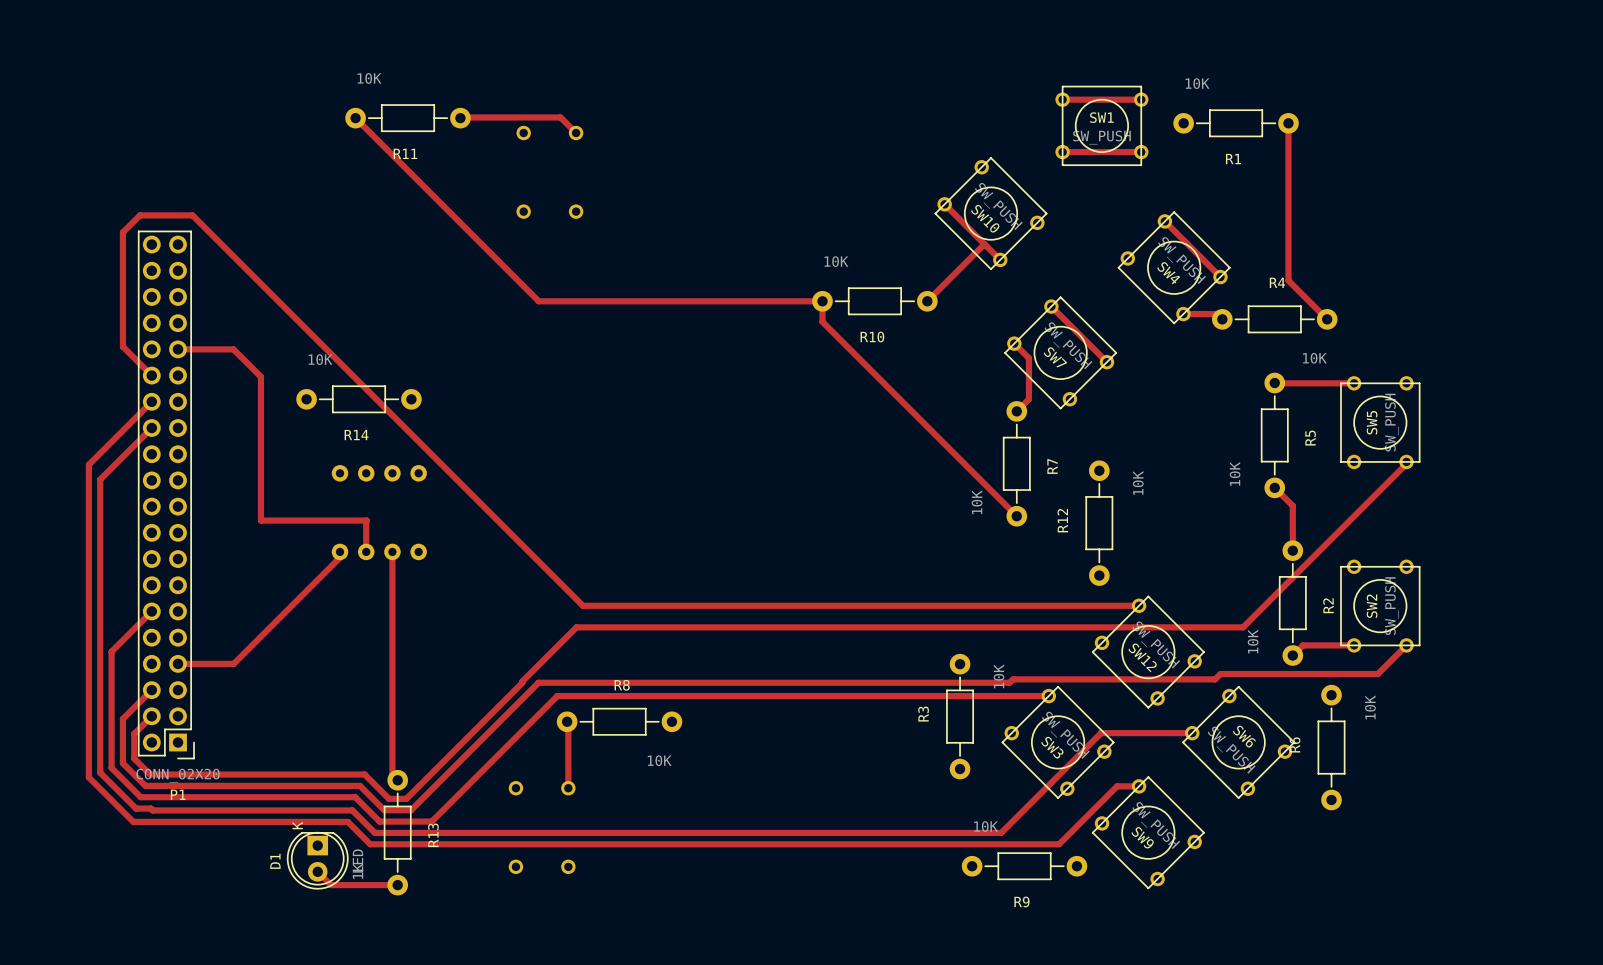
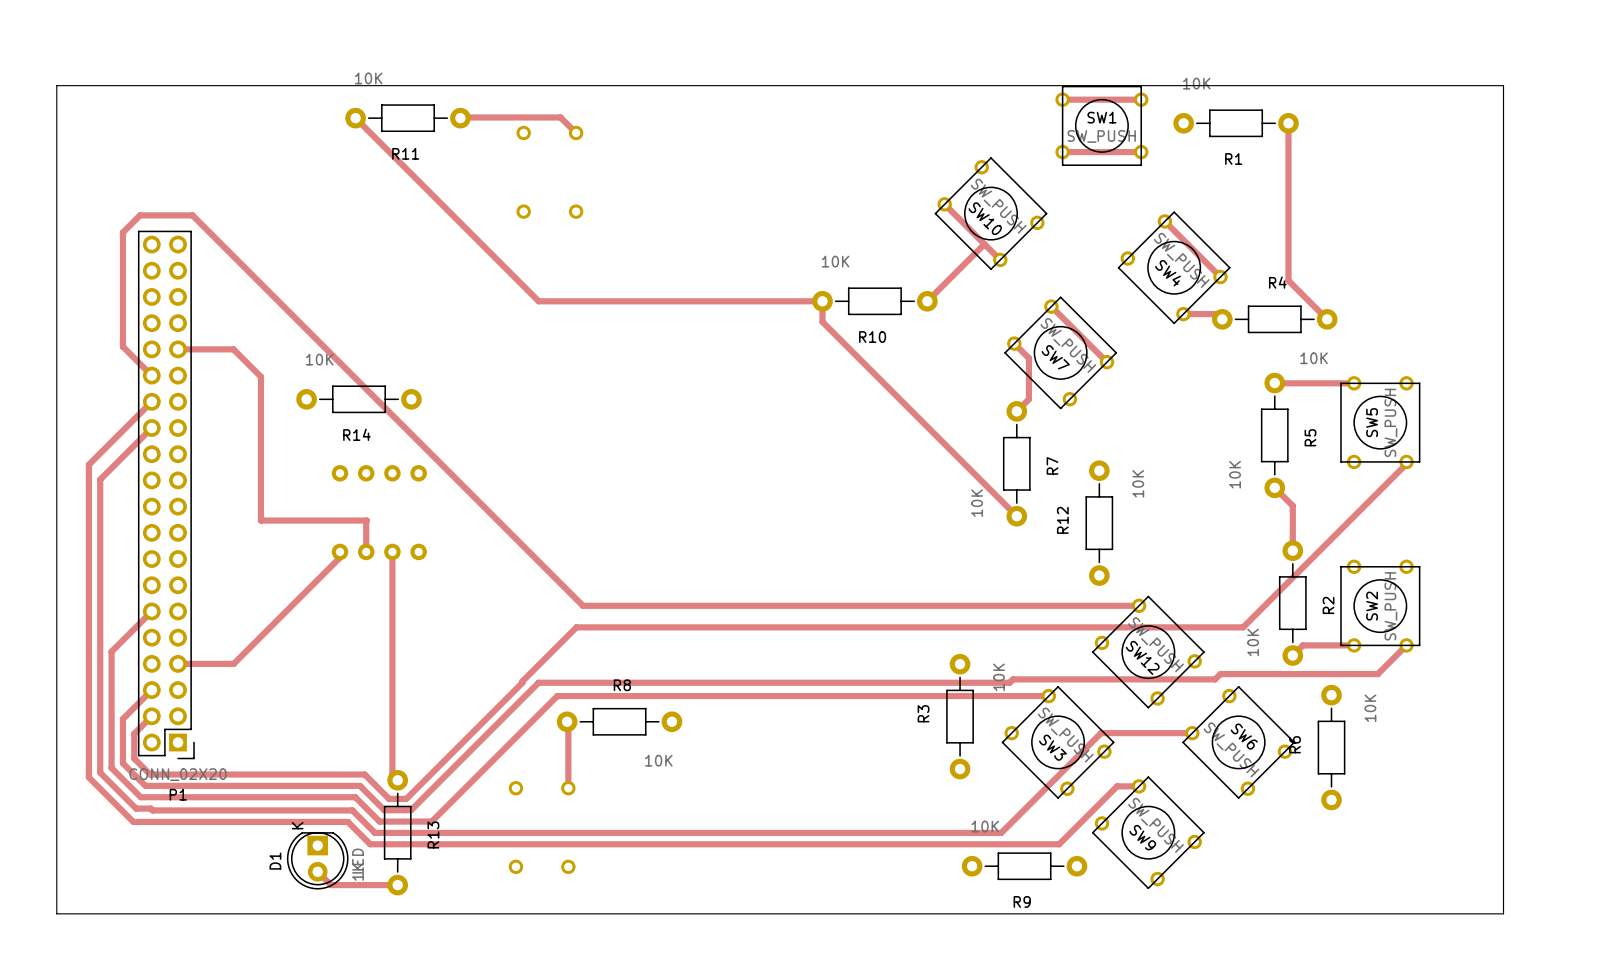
board edge: none -> (56, 85) (56, 913) (1503, 913) (1503, 85) (56, 85)

